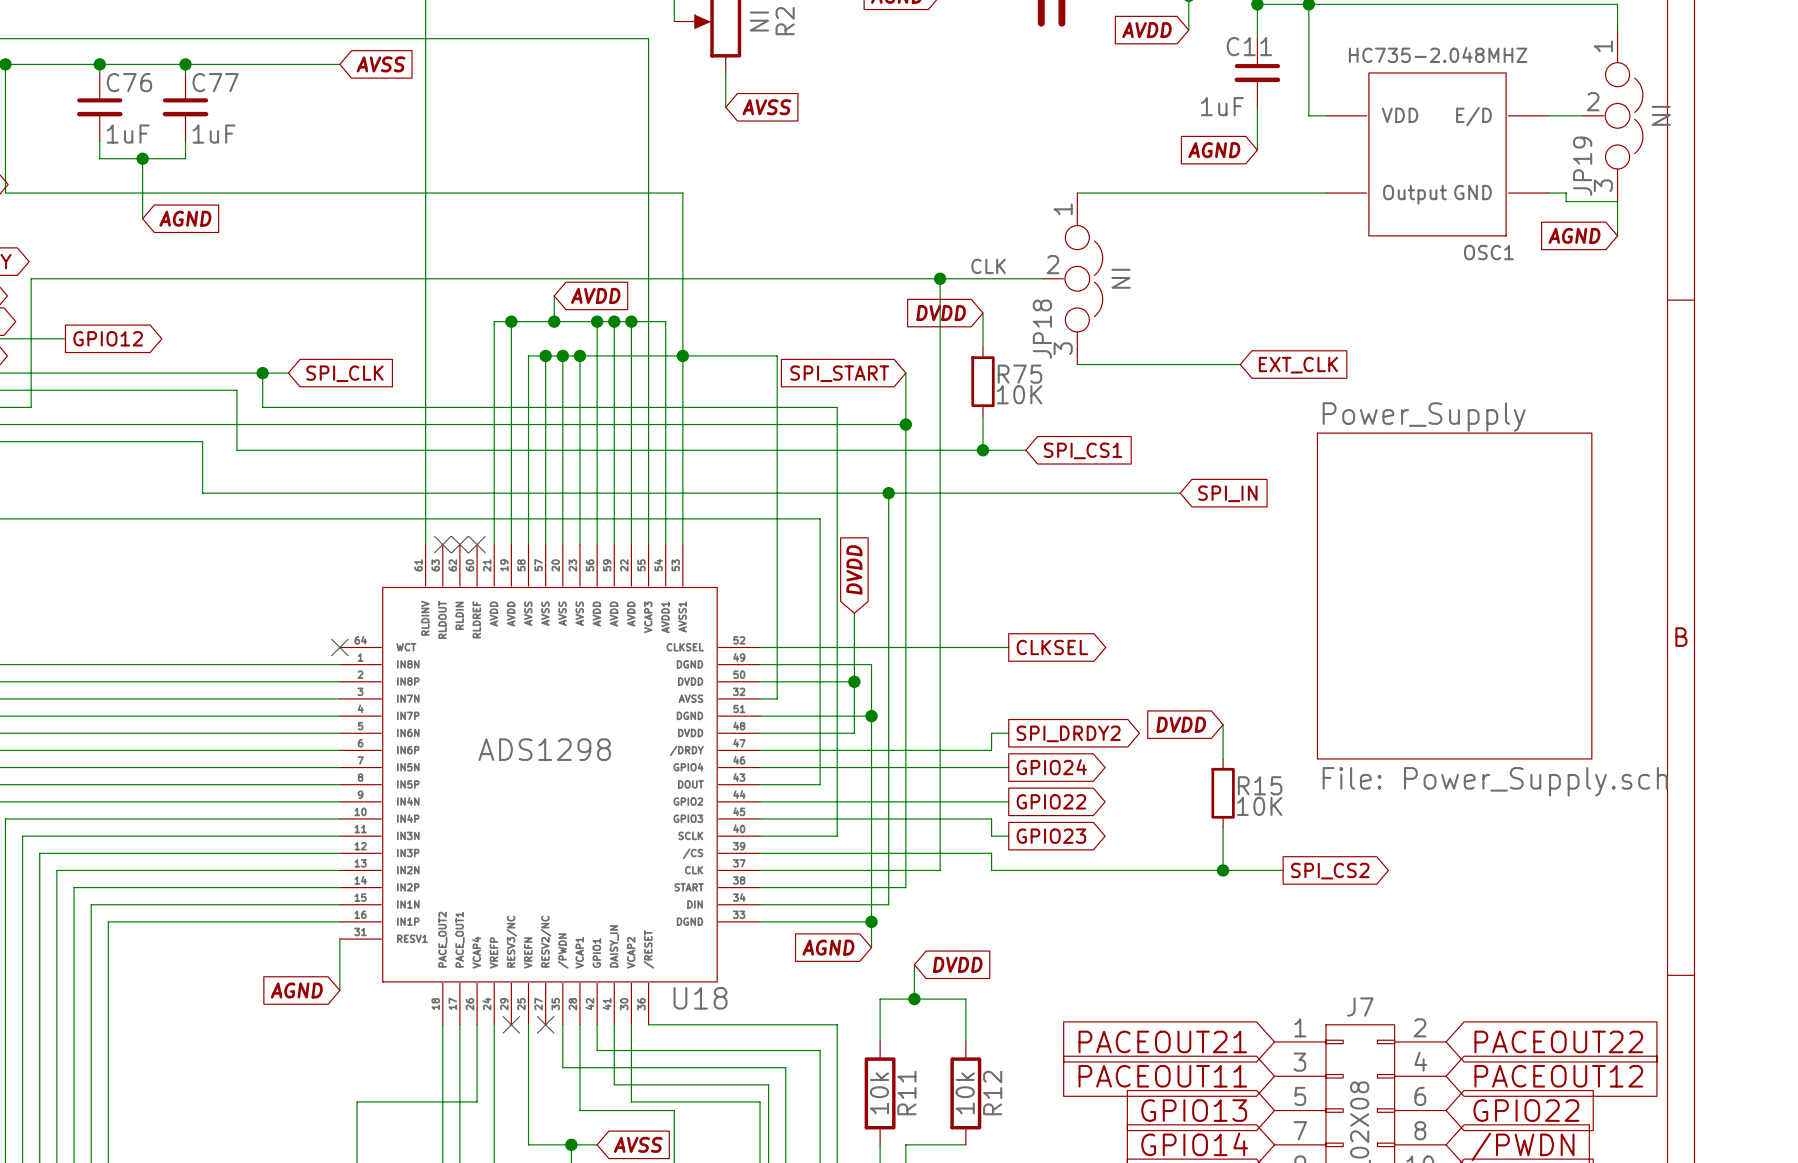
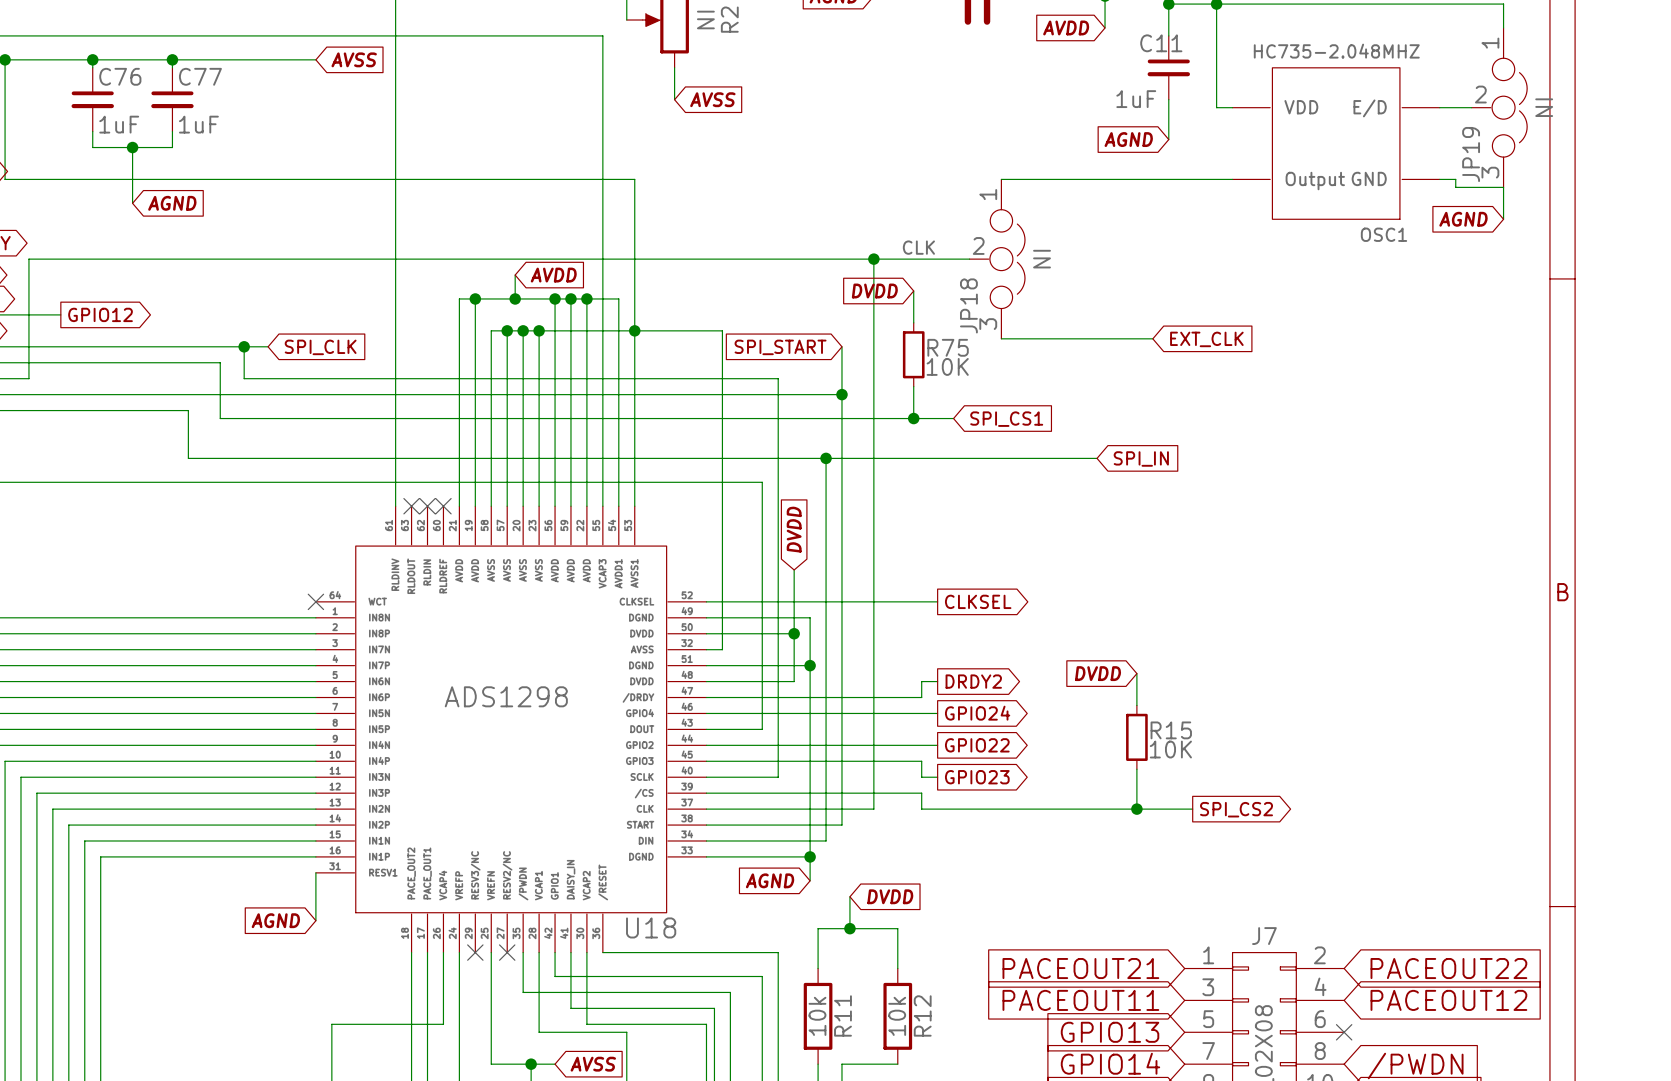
sheet Power_Supply: File: Power_Supply.sch (1454, 596) -> none
global label: SPI_DRDY2 (1068, 733) -> DRDY2 (973, 681)
no-connect mark: none -> (1344, 1032)
global label: GPIO22 (1526, 1110) -> none

